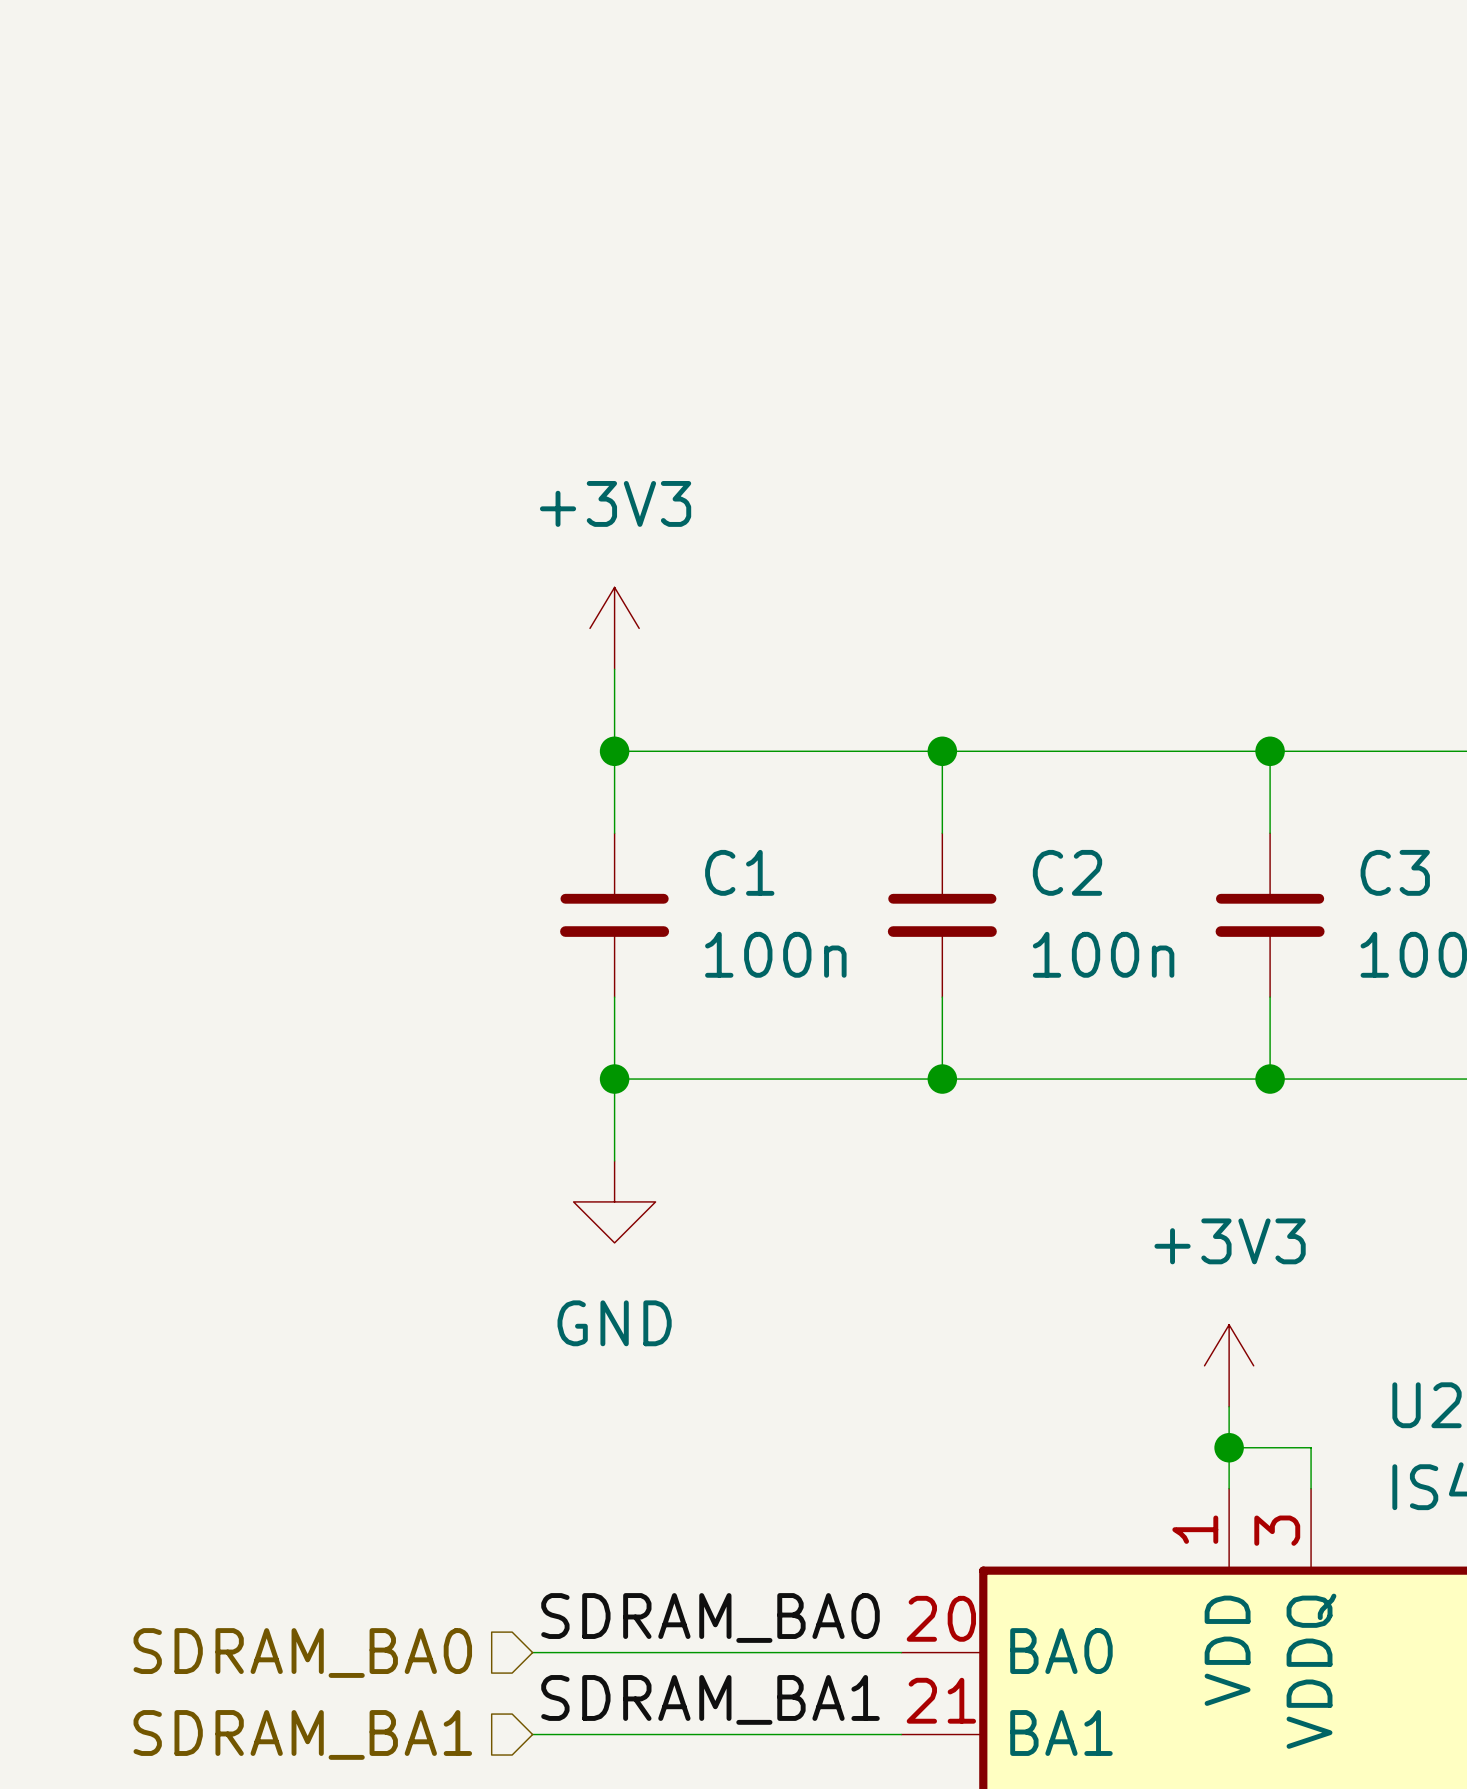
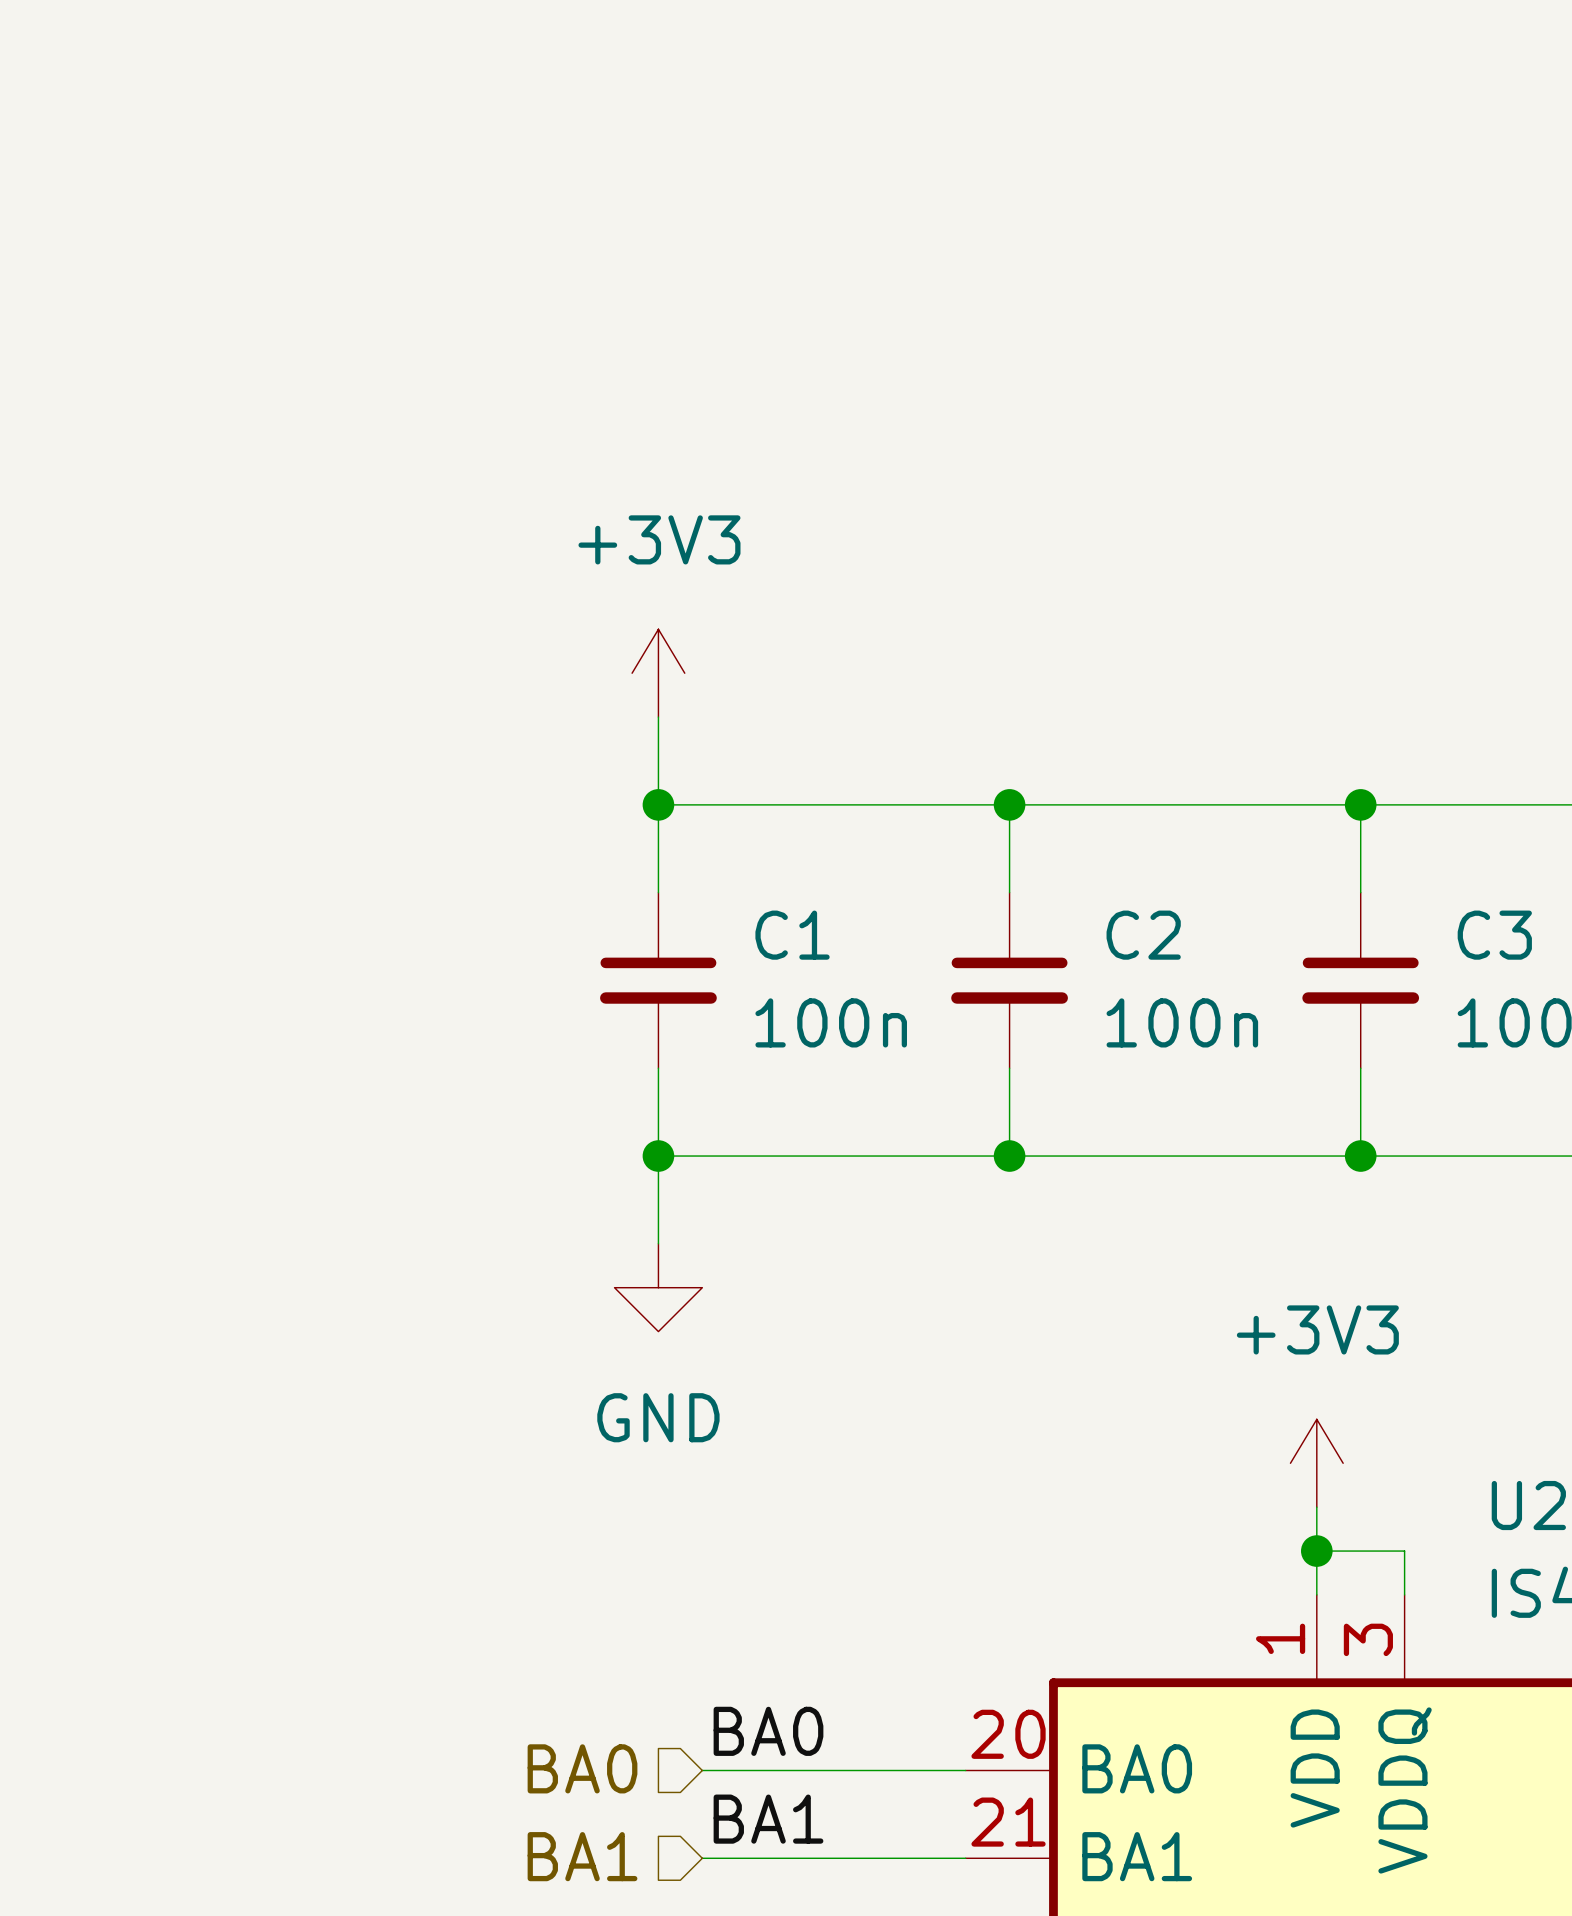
label: none -> BA0 (768, 1731)
label: SDRAM_BA0 (710, 1617) -> none
hierarchical label: none -> BA0 (582, 1768)
wire: (532, 1652) (655, 1652) -> none
hierarchical label: SDRAM_BA0 (302, 1653) -> none
label: none -> BA1 (768, 1819)
label: SDRAM_BA1 (710, 1699) -> none
hierarchical label: none -> BA1 (582, 1856)
hierarchical label: SDRAM_BA1 (302, 1734) -> none
wire: (532, 1734) (655, 1734) -> none

